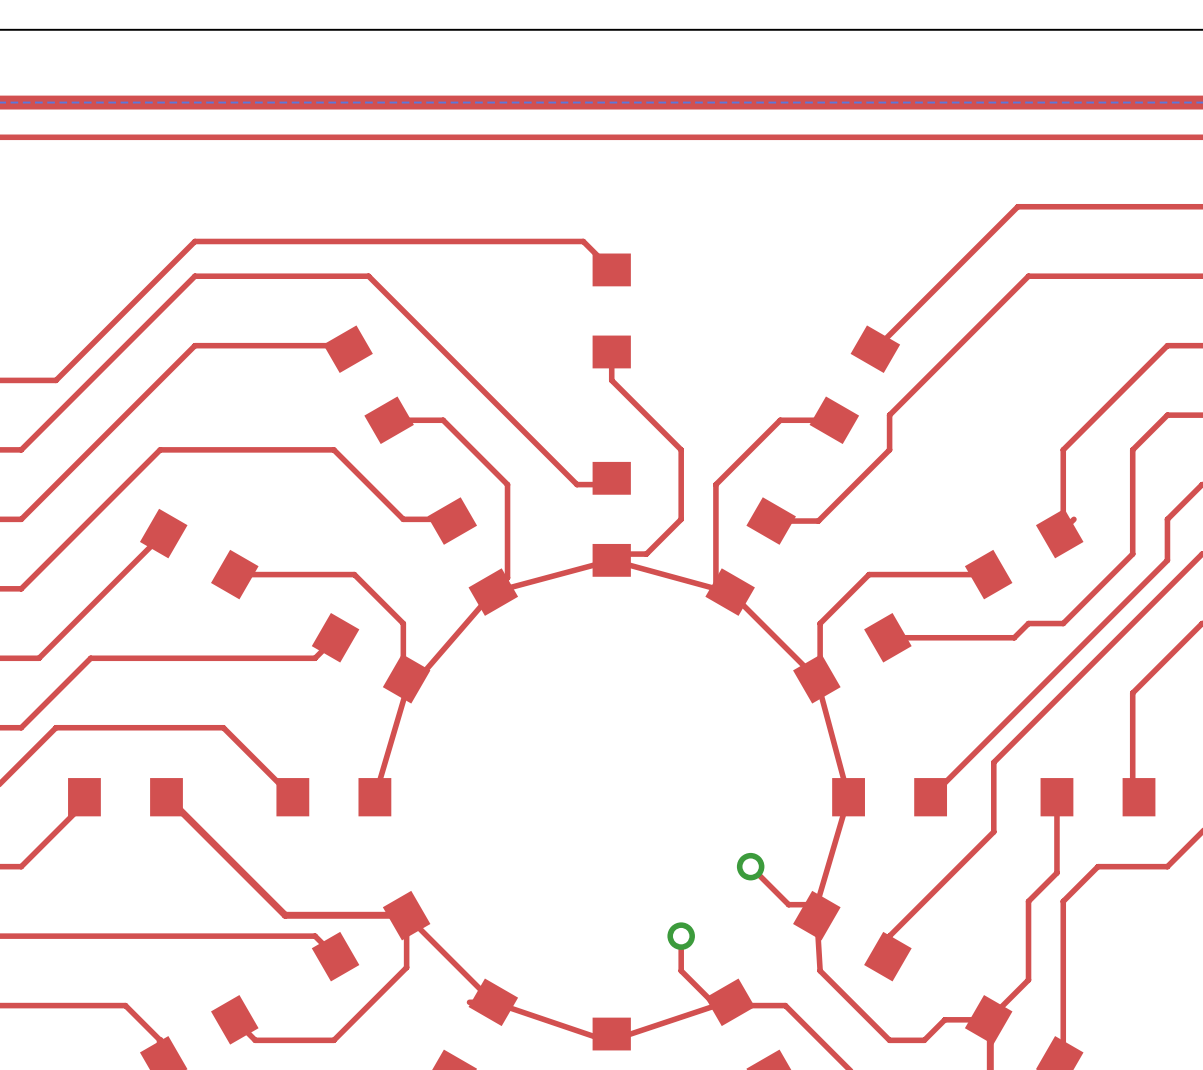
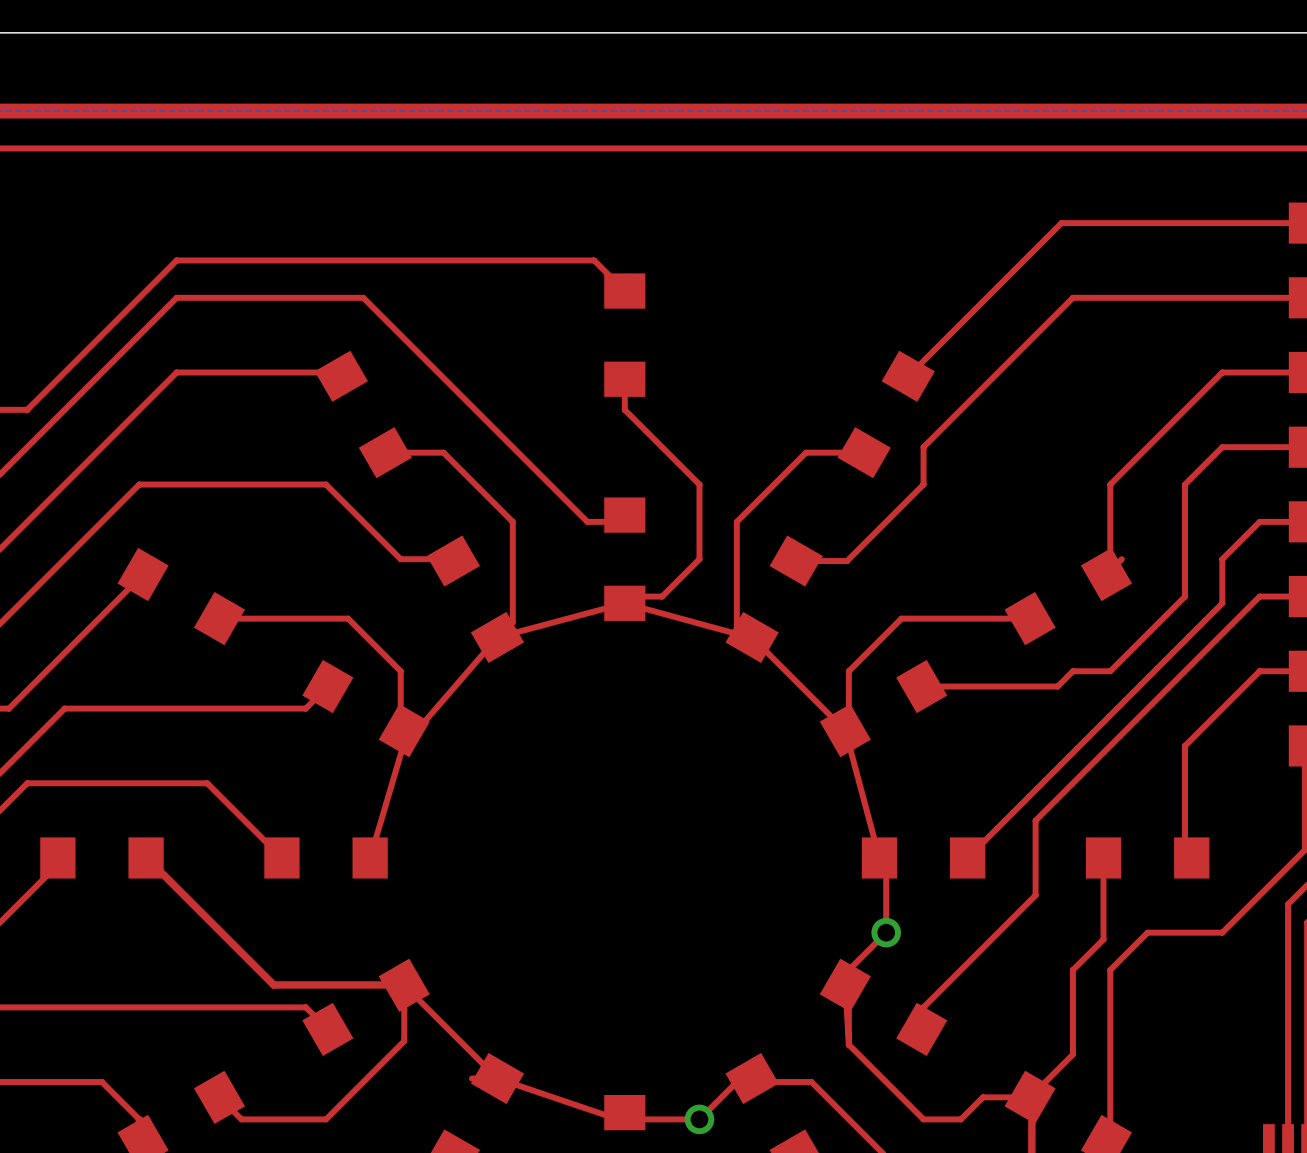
top track: (848, 797) (816, 904) (788, 904) (750, 866) -> none
top track: none -> (886, 864) (886, 932) (848, 970) (848, 1044)
via: (750, 866) -> none
via: none -> (886, 932)
top track: (681, 936) (681, 970) (715, 1005) (611, 1040) -> (736, 1082) (699, 1119) (624, 1119)
via: (681, 936) -> none
via: none -> (699, 1119)

